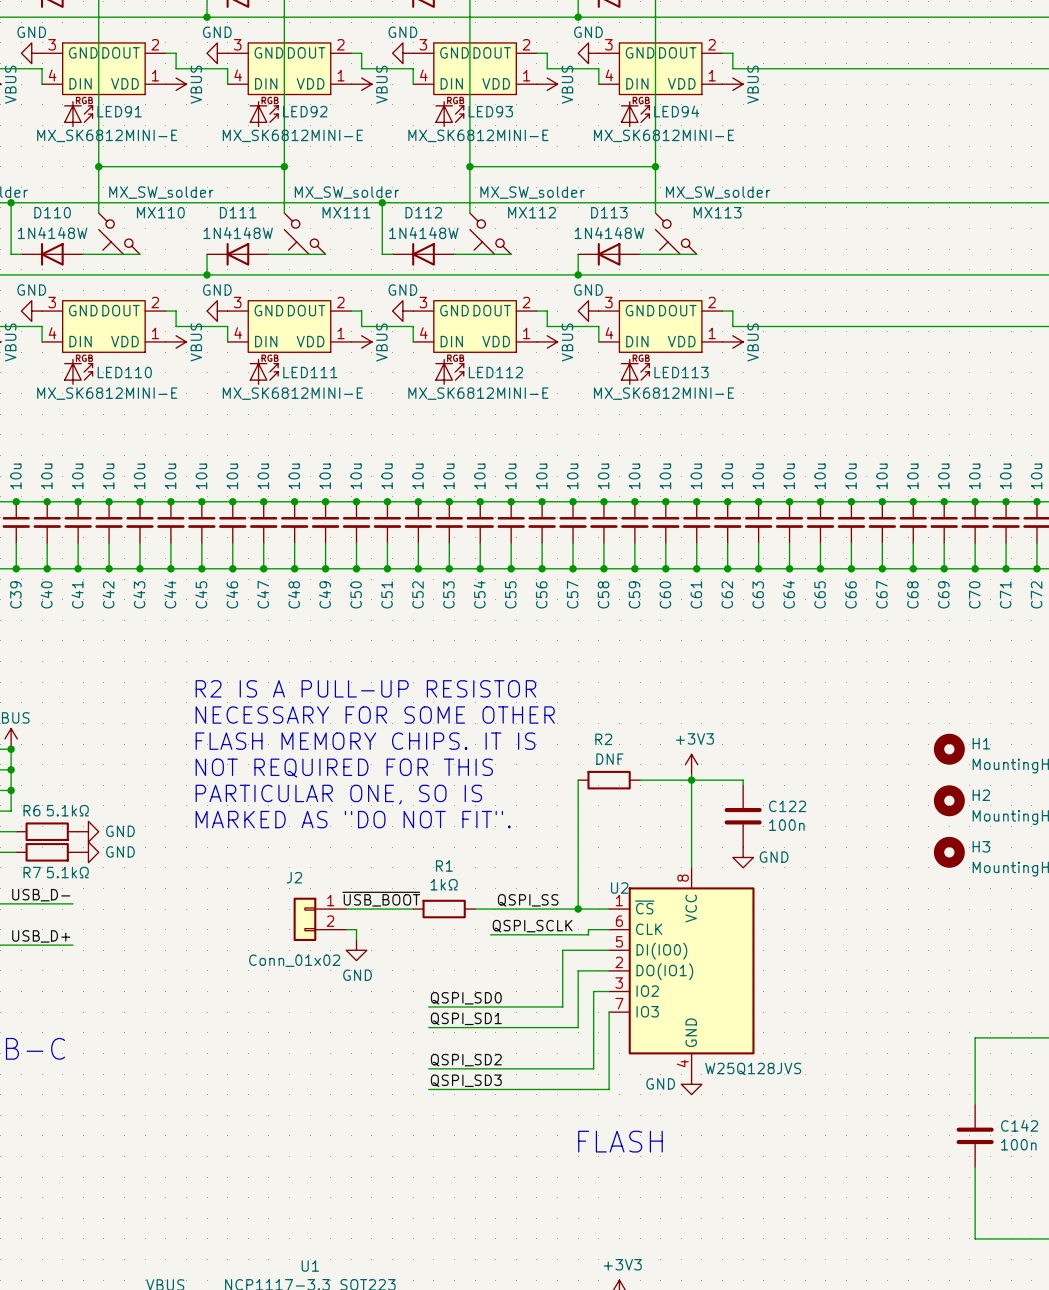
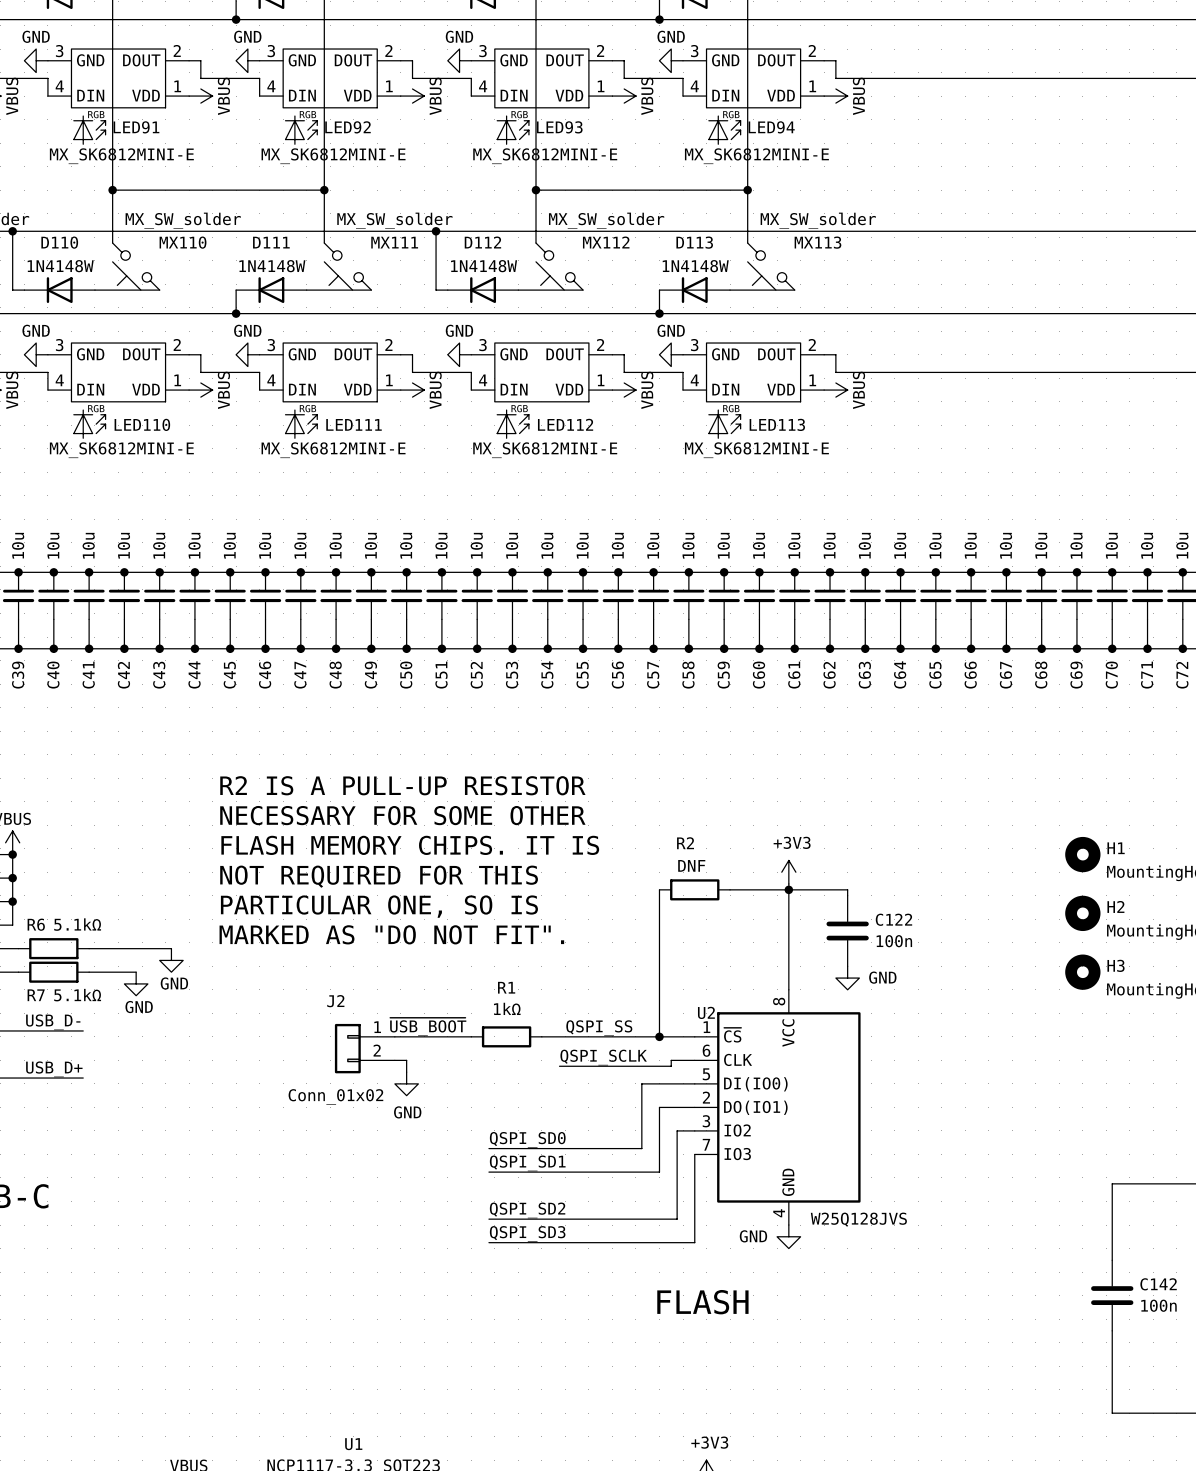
wire: none -> (89, 948) (171, 948)
power symbol: GND (88, 831) -> none
power symbol: none -> GND (171, 960)
wire: none -> (89, 972) (136, 972)
power symbol: GND (88, 852) -> none
power symbol: none -> GND (136, 983)

